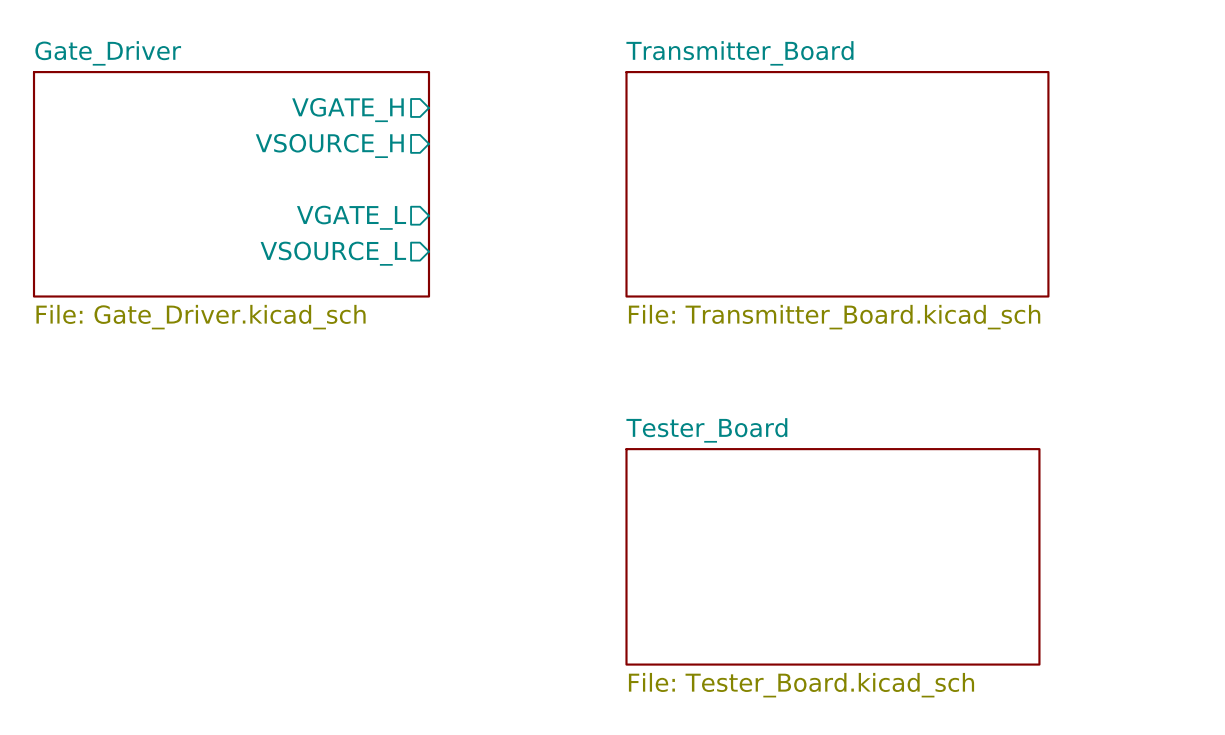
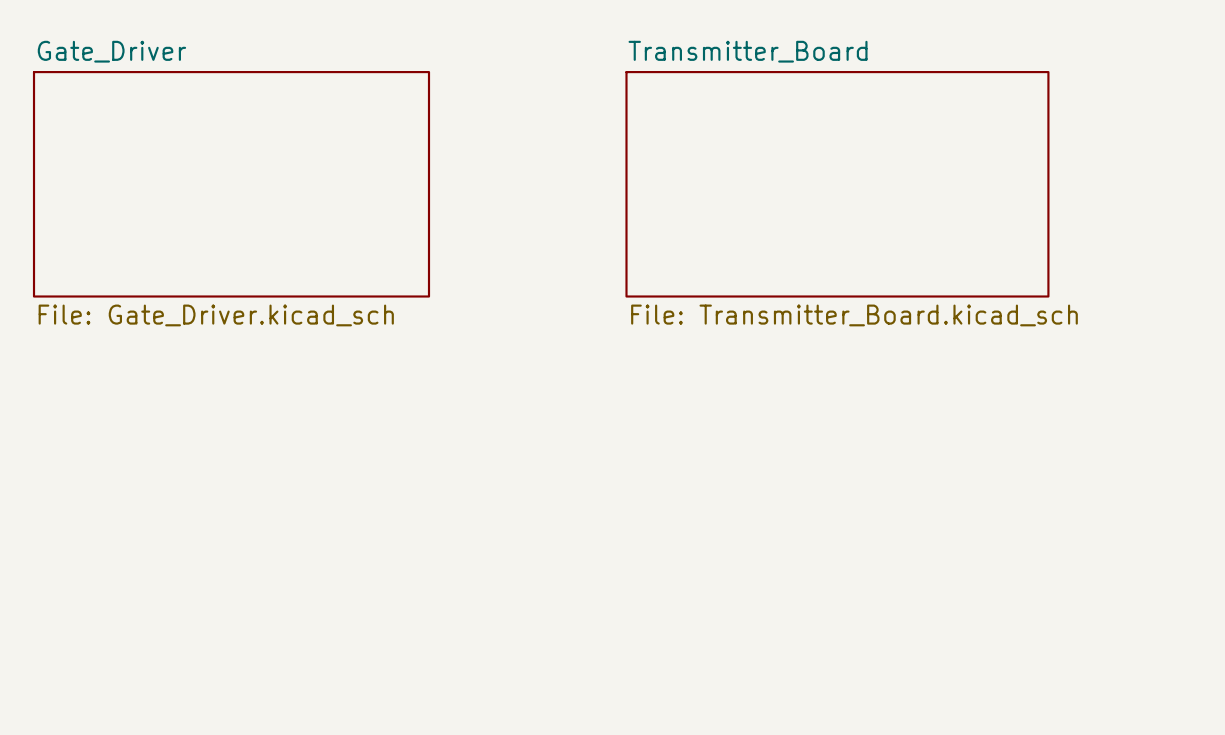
sheet pin: VGATE_H (347, 110) -> none
sheet pin: VSOURCE_H (329, 145) -> none
sheet pin: VGATE_L (351, 217) -> none
sheet pin: VSOURCE_L (333, 253) -> none
sheet Tester_Board: File: Tester_Board.kicad_sch (832, 556) -> none

